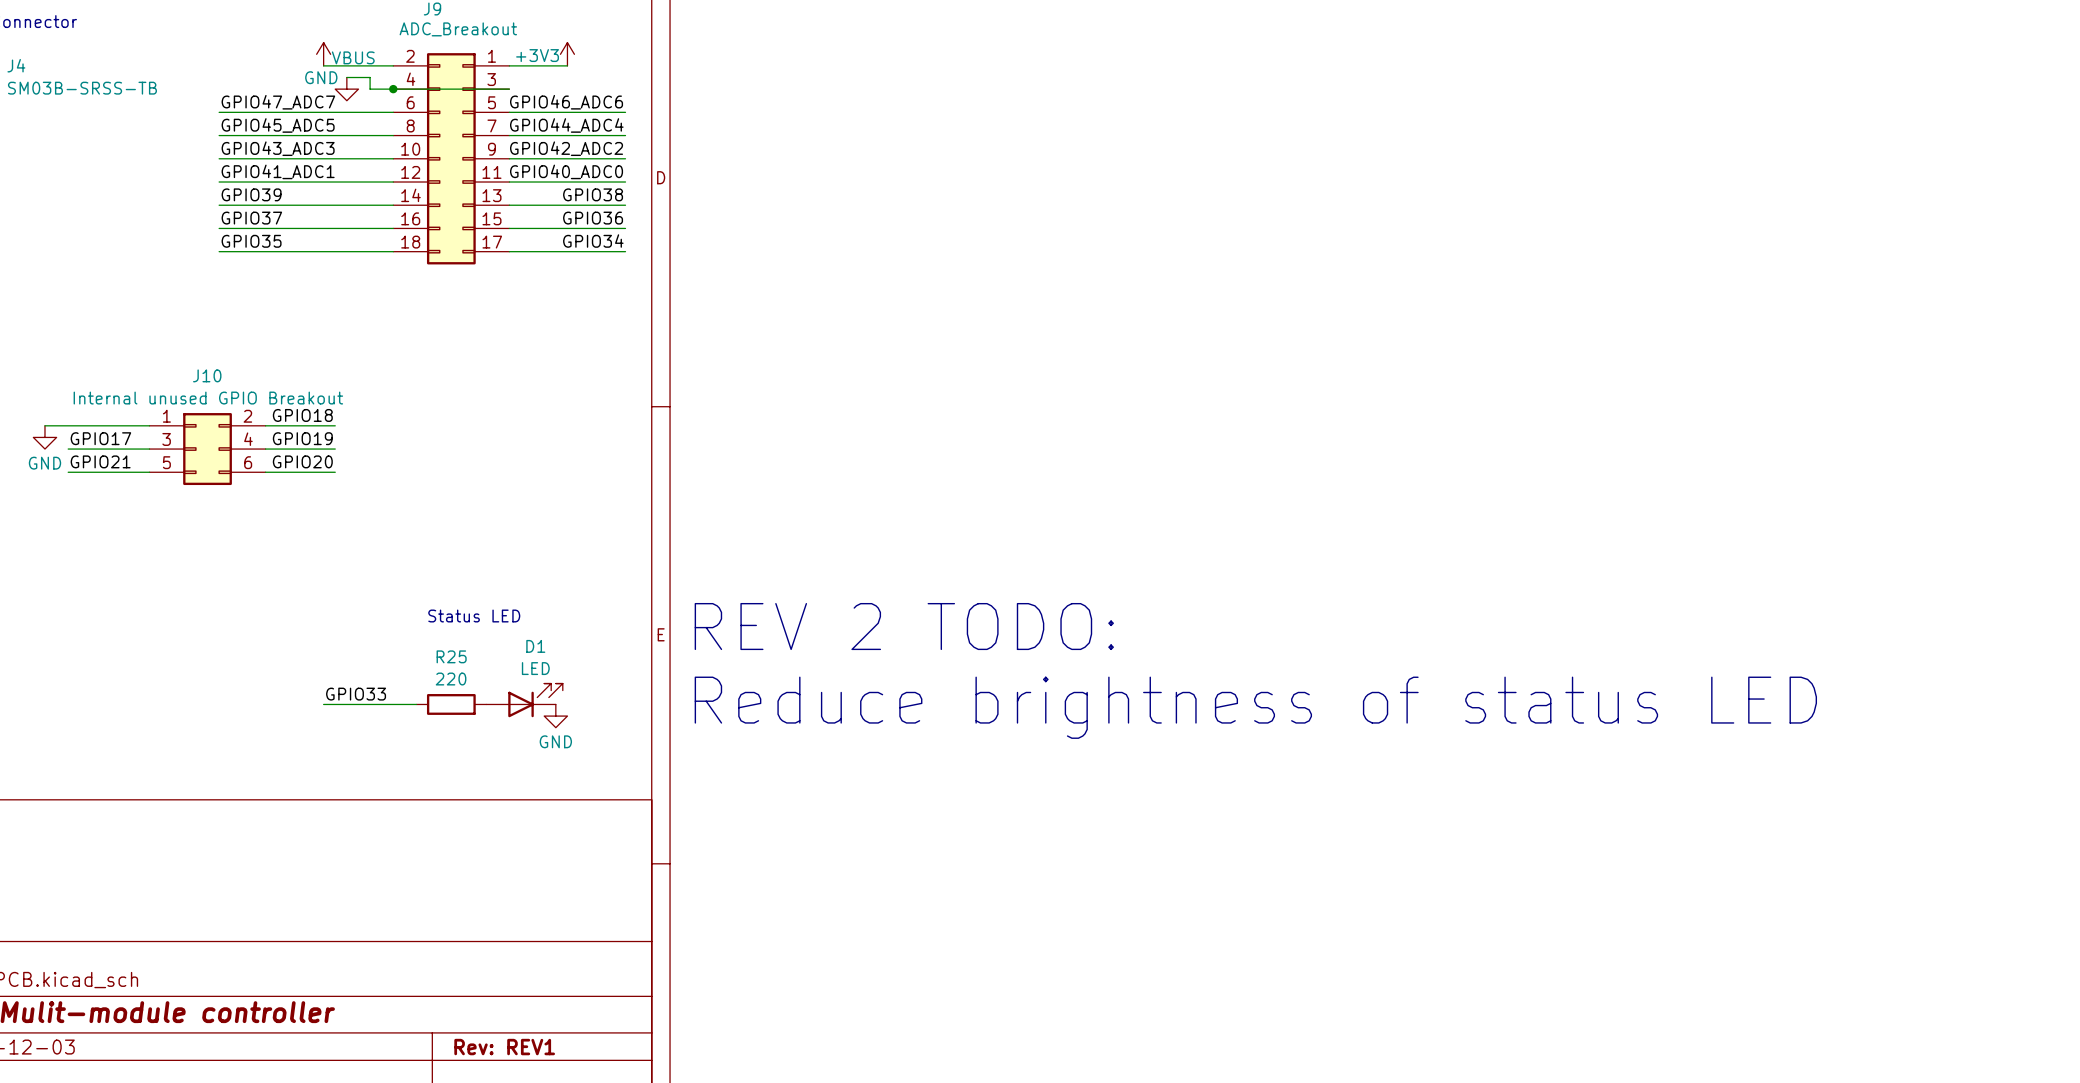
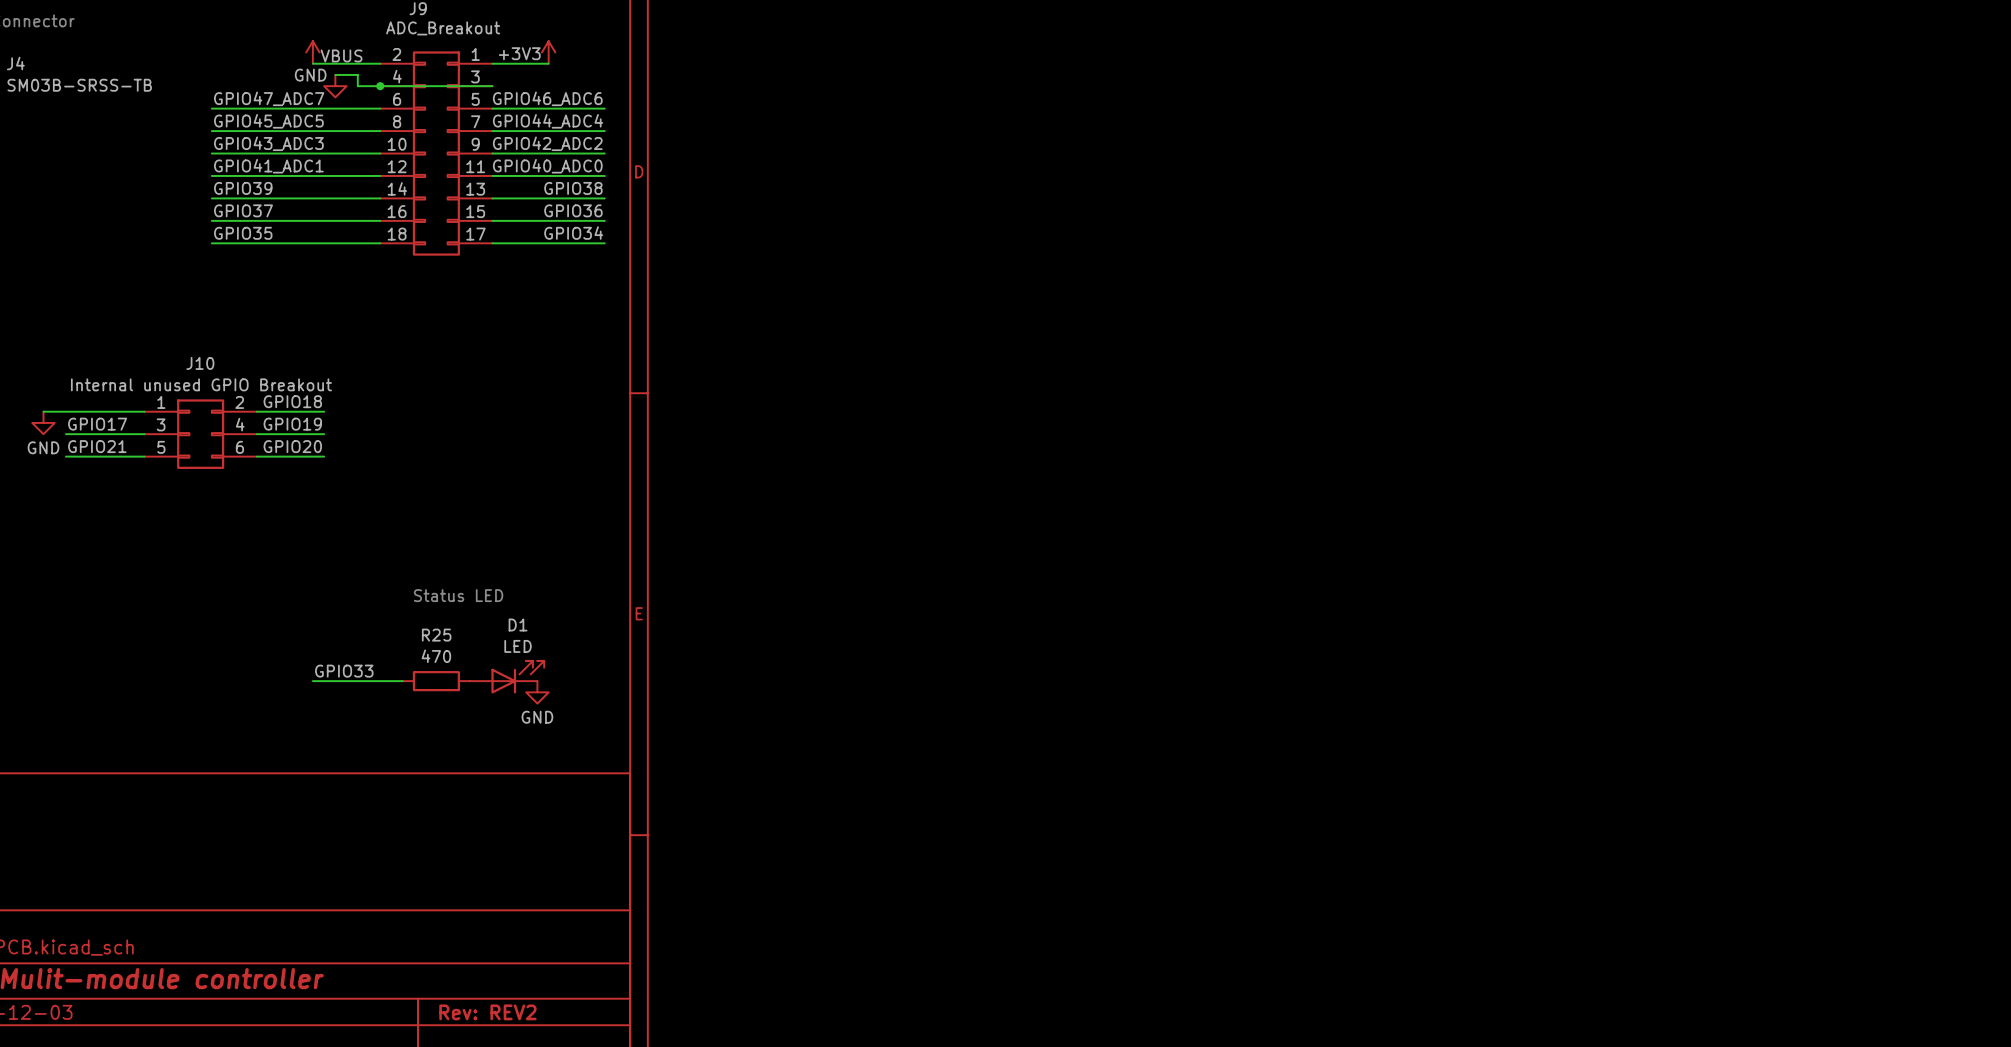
text: REV 2 TODO: (904, 626) -> none
R25 value: 220 (451, 679) -> 470 (436, 656)
text: Reduce brightness of status LED (1255, 707) -> none
title block: Rev: REV1 (504, 1047) -> Rev: REV2 (487, 1012)

